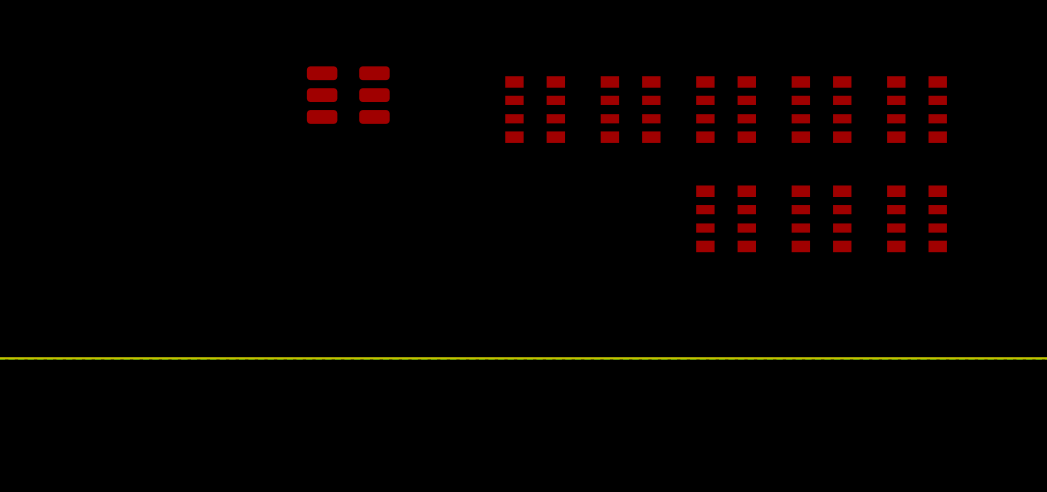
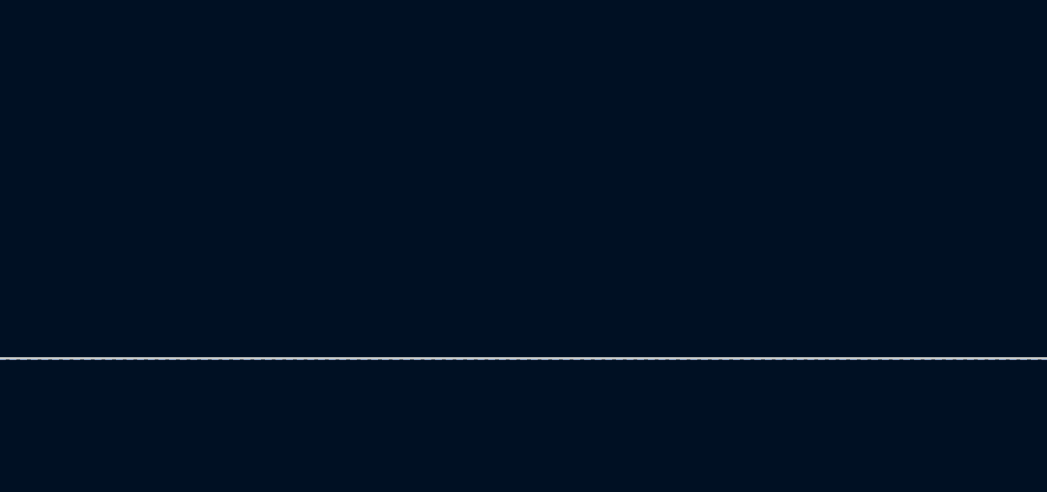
part: (348, 95) -> none
part: (535, 109) -> none
part: (630, 109) -> none
part: (726, 109) -> none
part: (821, 109) -> none
part: (917, 109) -> none
part: (726, 218) -> none
part: (821, 218) -> none
part: (917, 218) -> none

